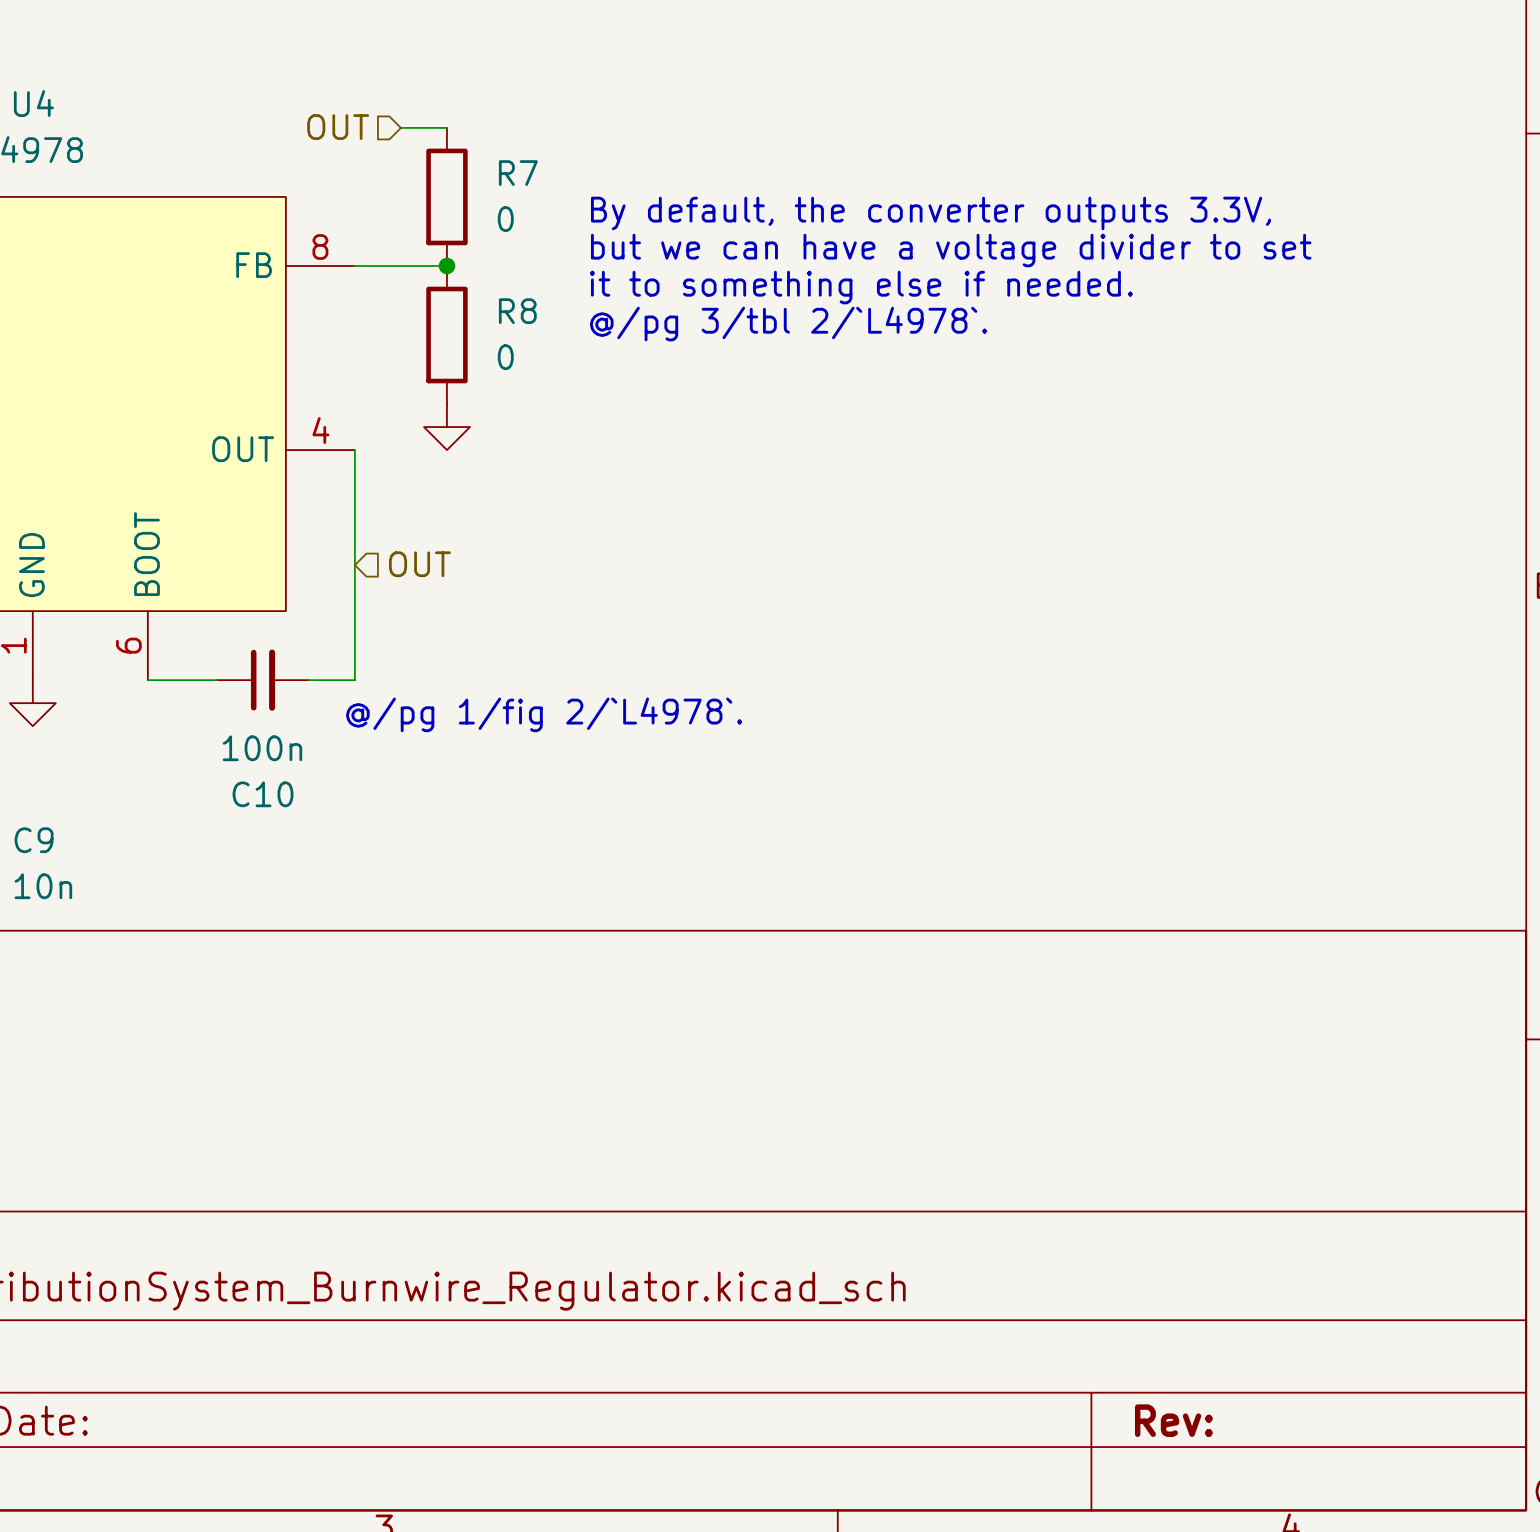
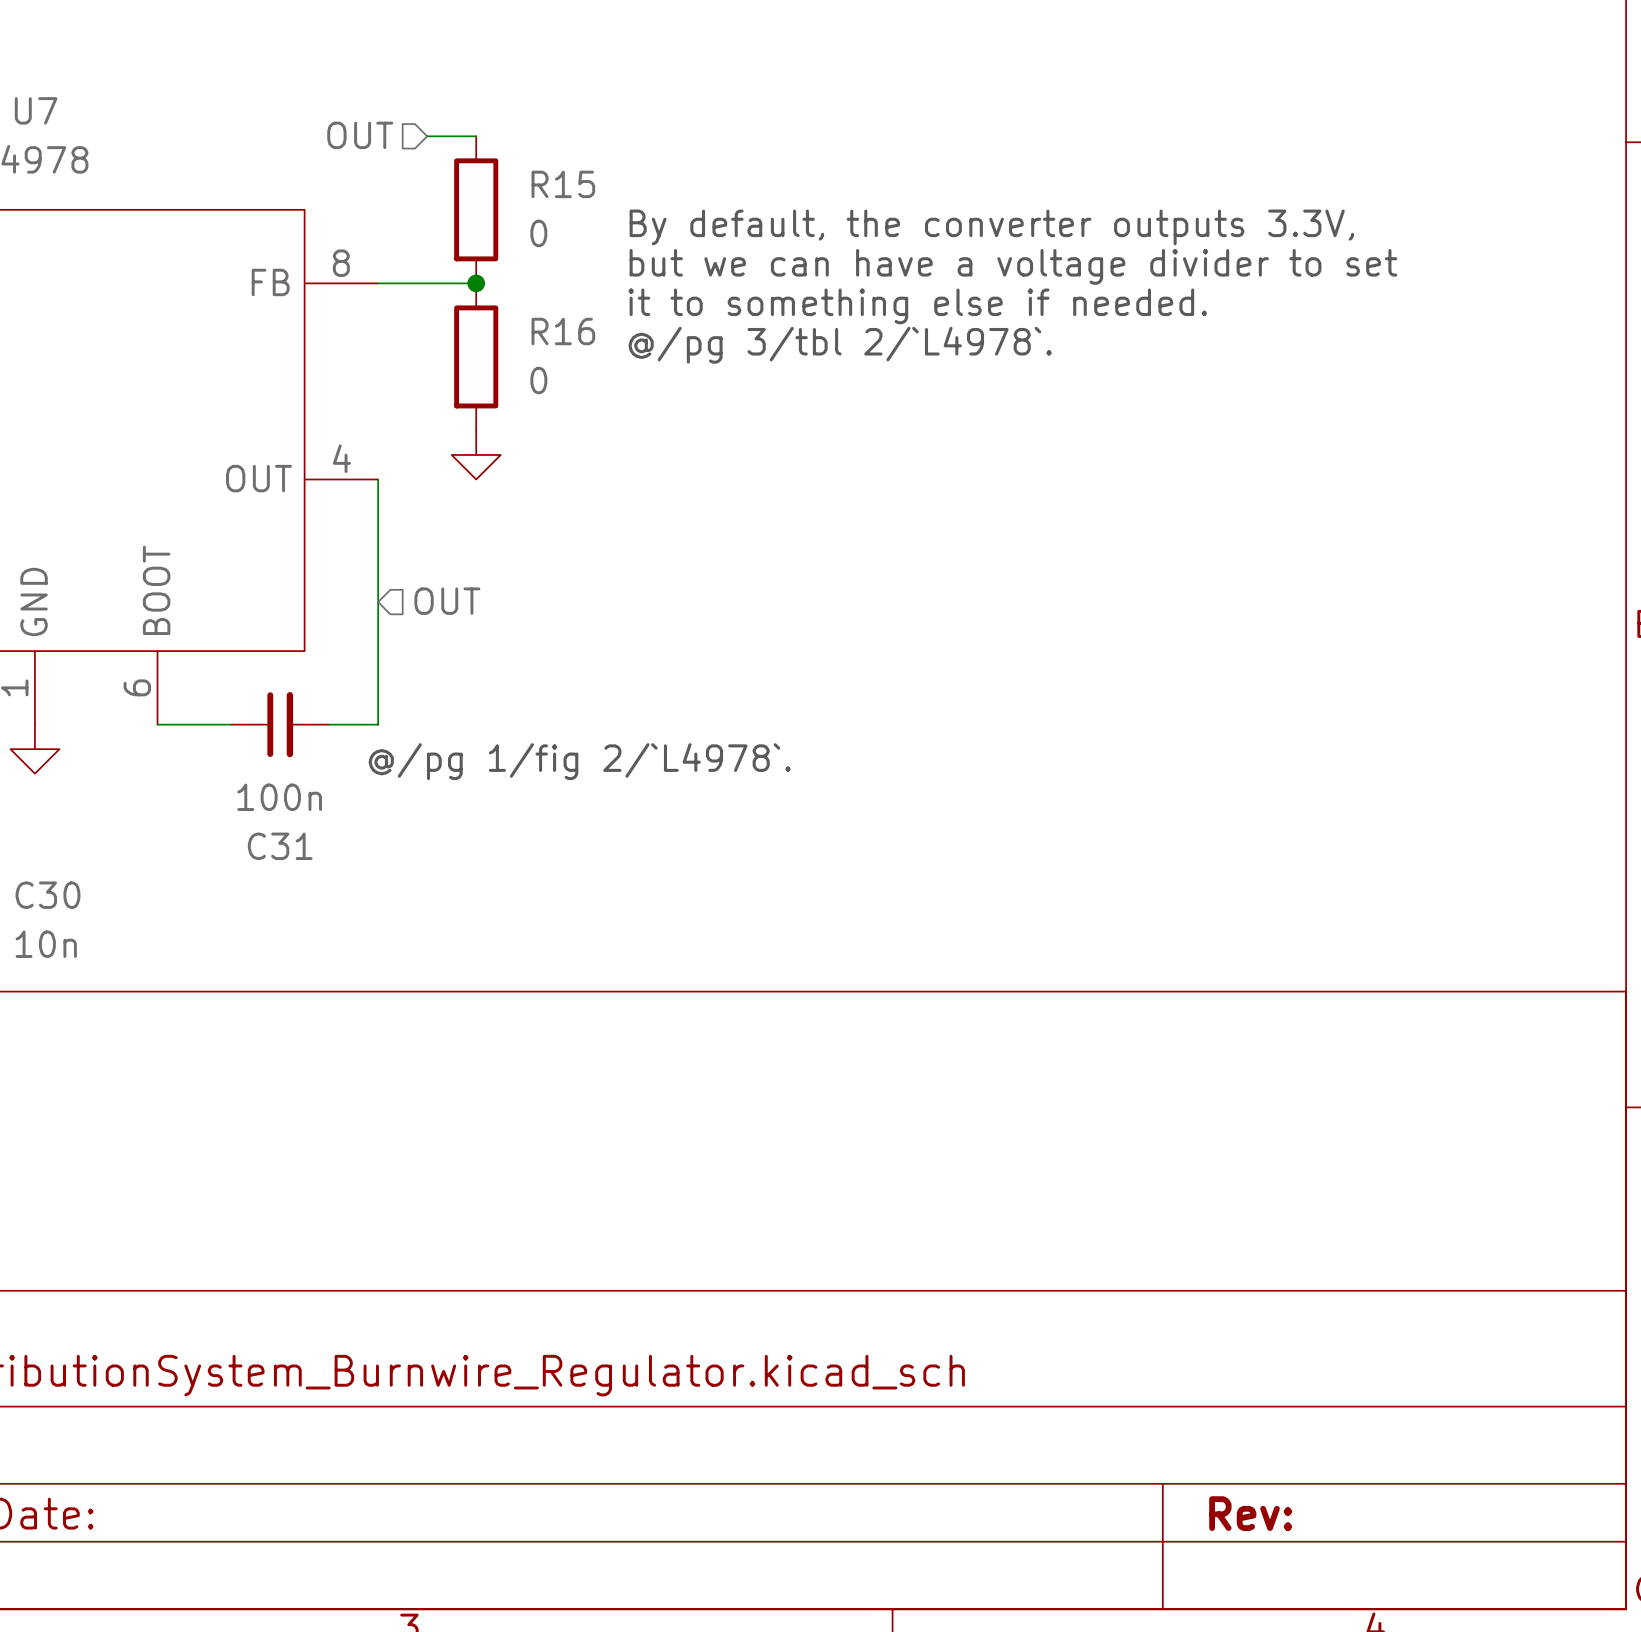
U4 name: U4 (33, 103) -> U7 (36, 110)
R7 name: R7 (518, 173) -> R15 (563, 184)
R8 name: R8 (517, 311) -> R16 (563, 331)
C10 name: C10 (263, 794) -> C31 (280, 846)
C9 name: C9 (34, 840) -> C30 (47, 895)

